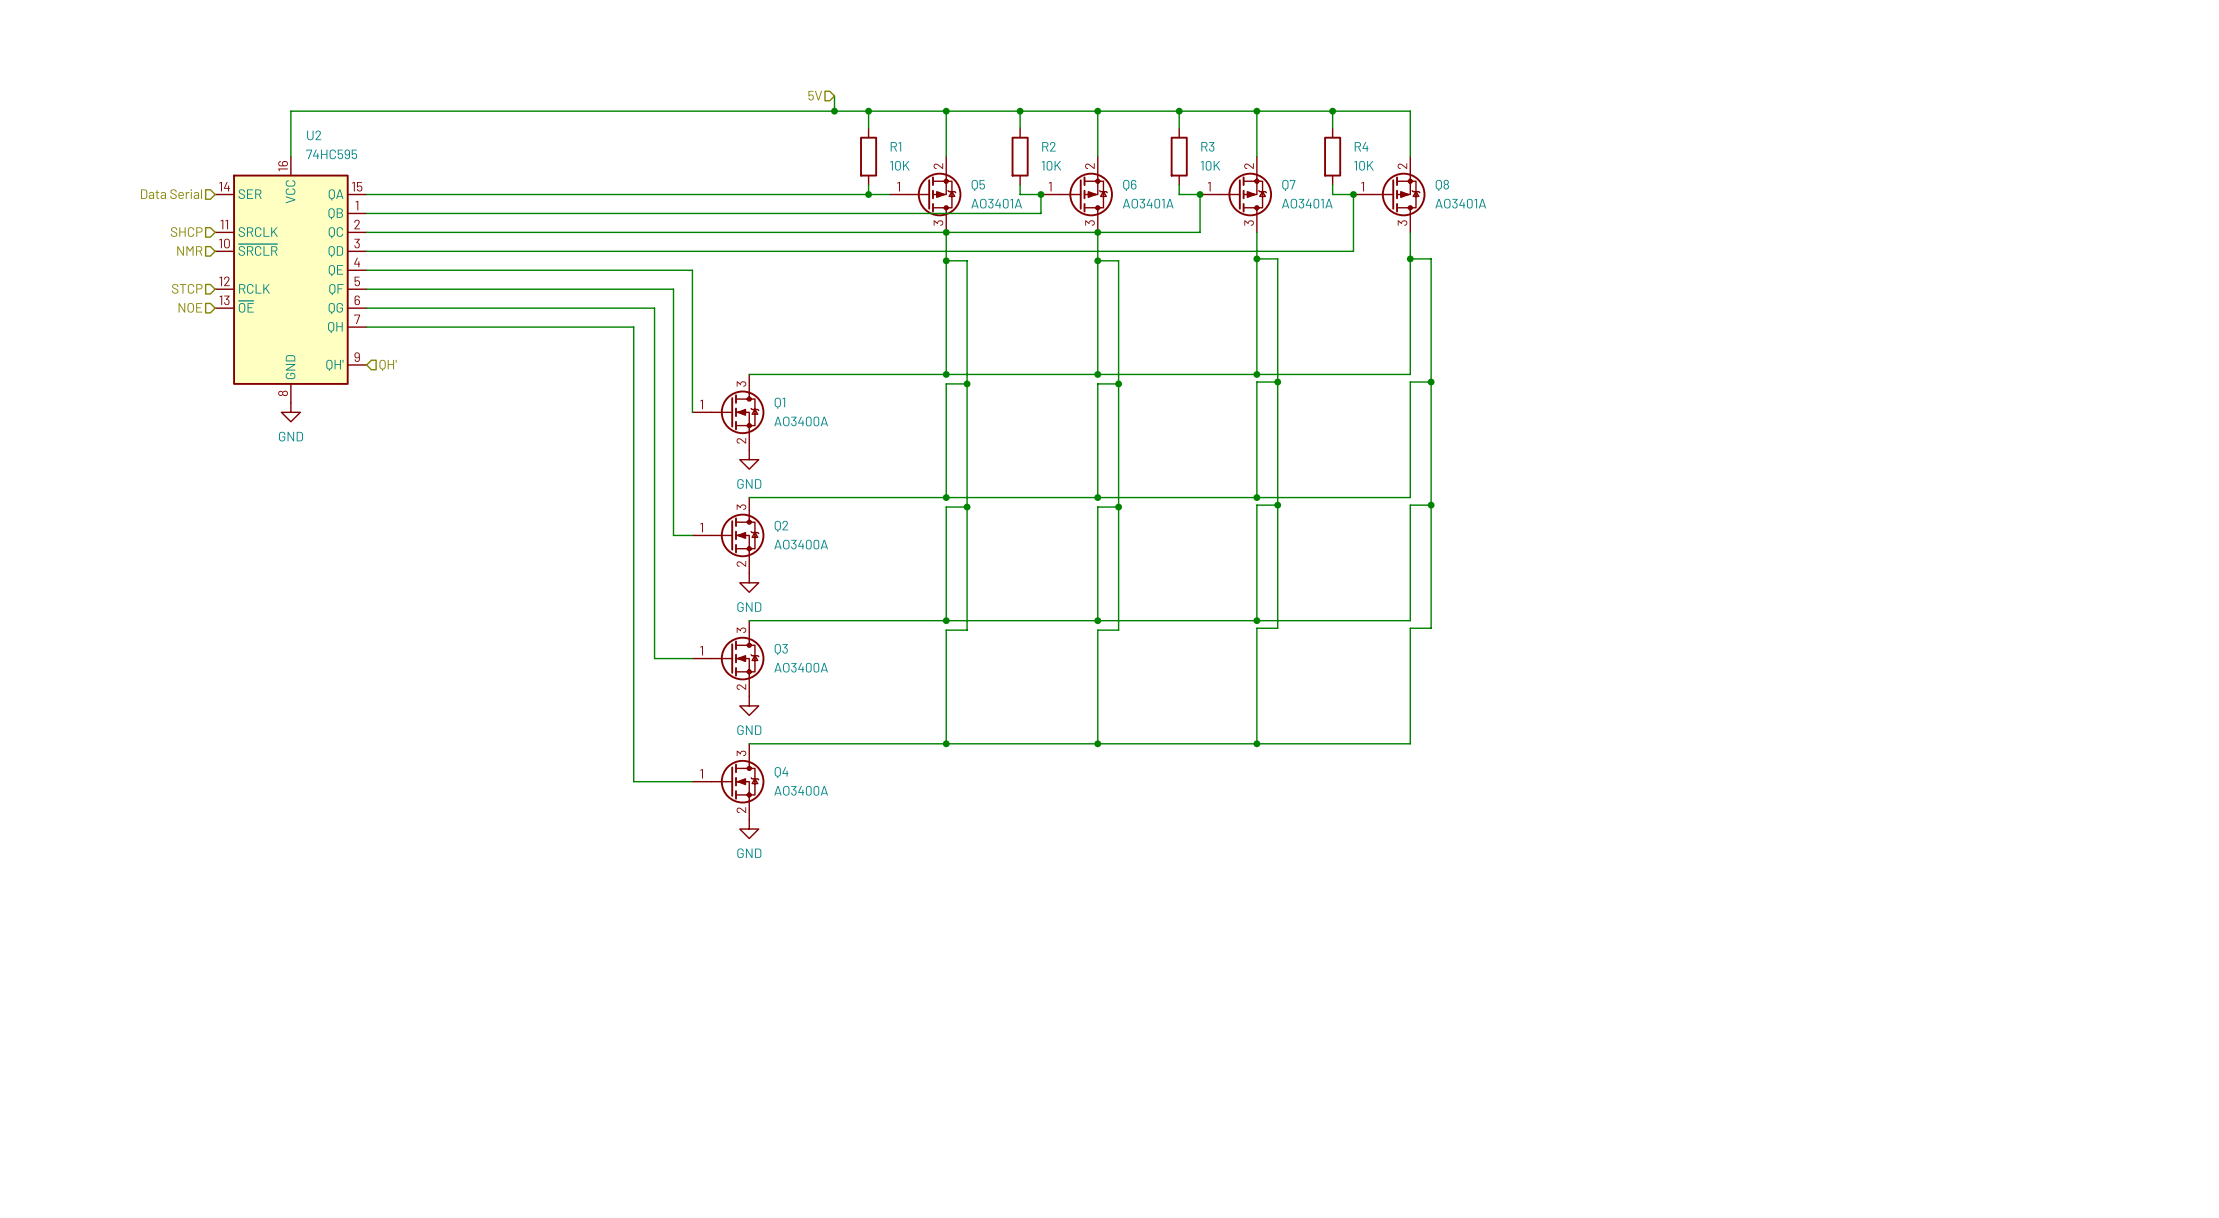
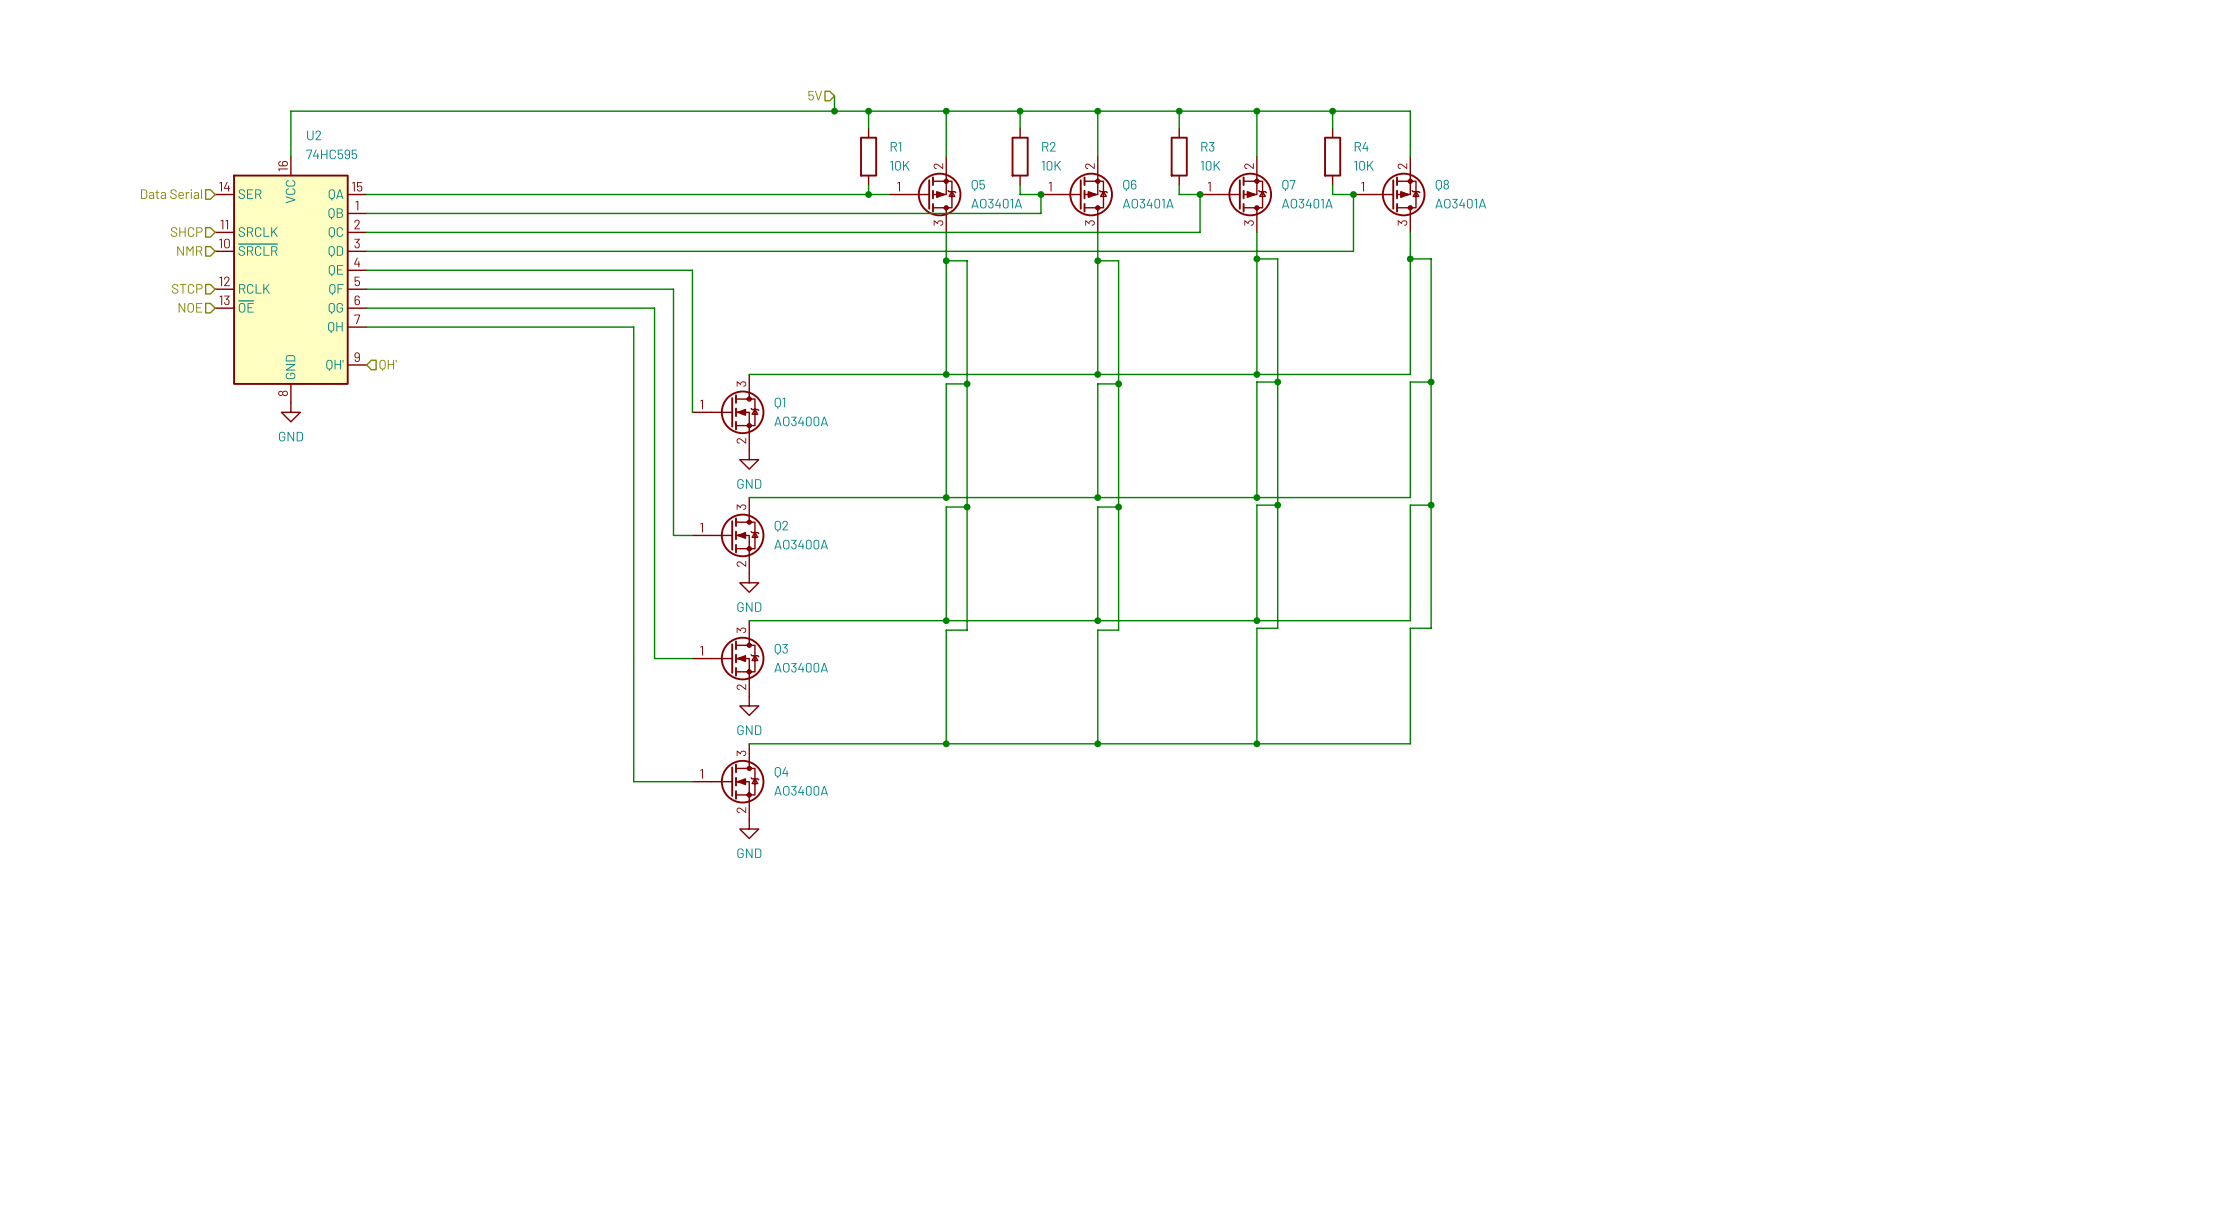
junction: (946, 232) -> none
junction: (1097, 232) -> none

